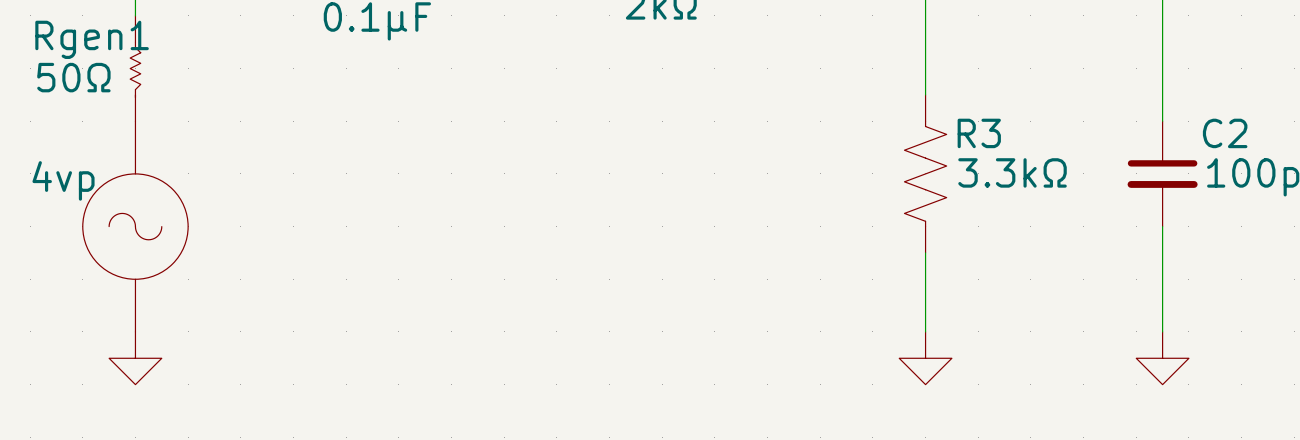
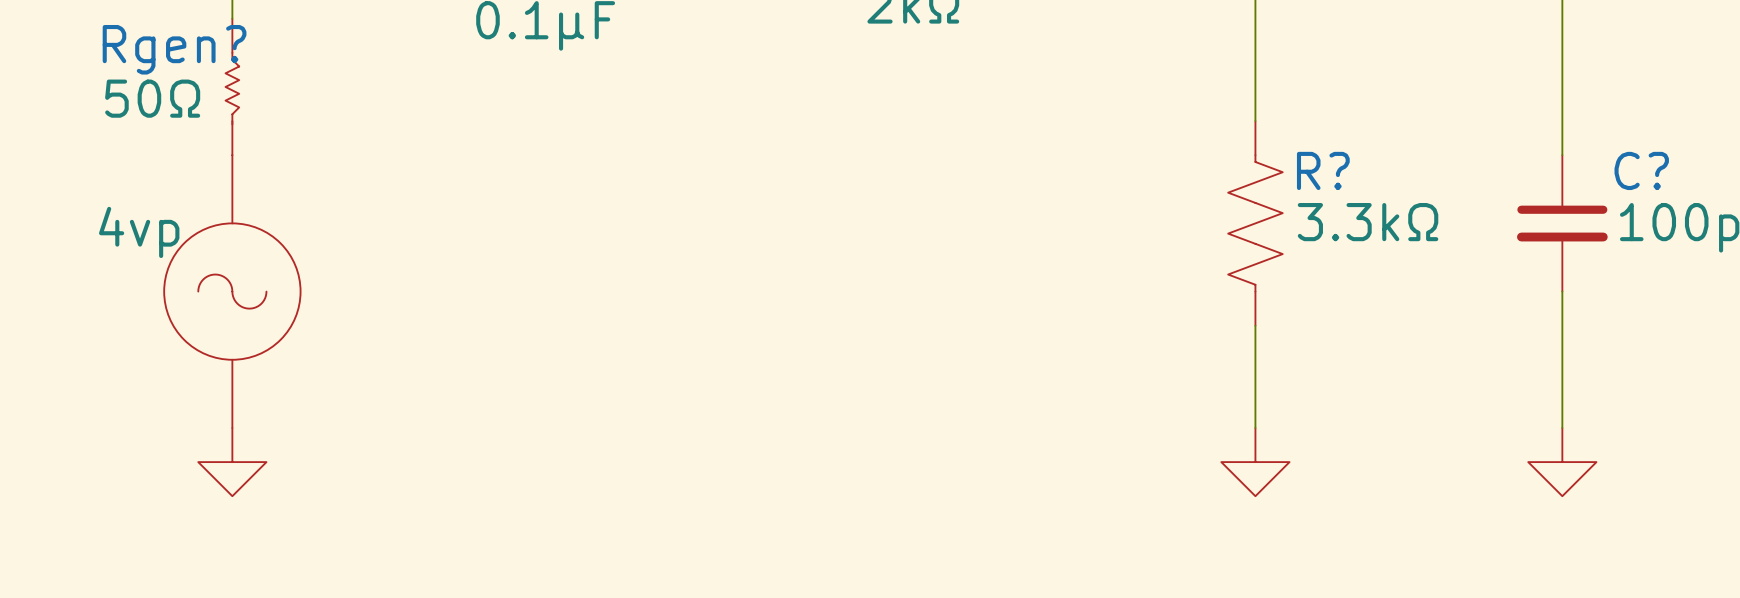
Rgen1 name: Rgen1 (92, 39) -> Rgen? (174, 49)
R3 name: R3 (979, 133) -> R? (1323, 170)
C2 name: C2 (1225, 133) -> C? (1641, 170)

